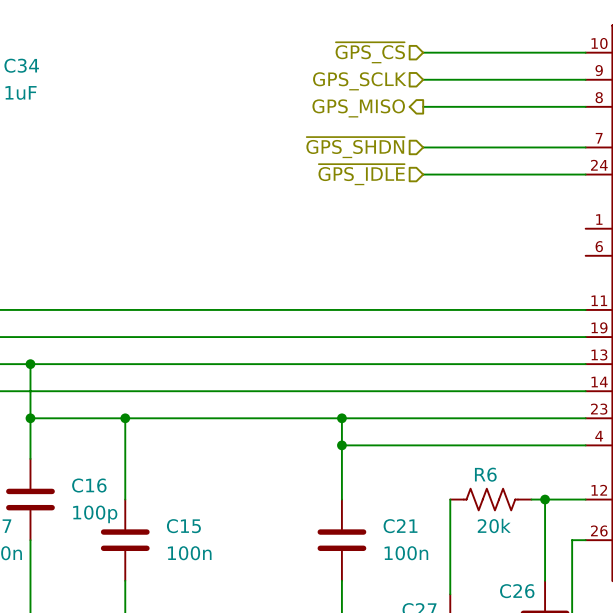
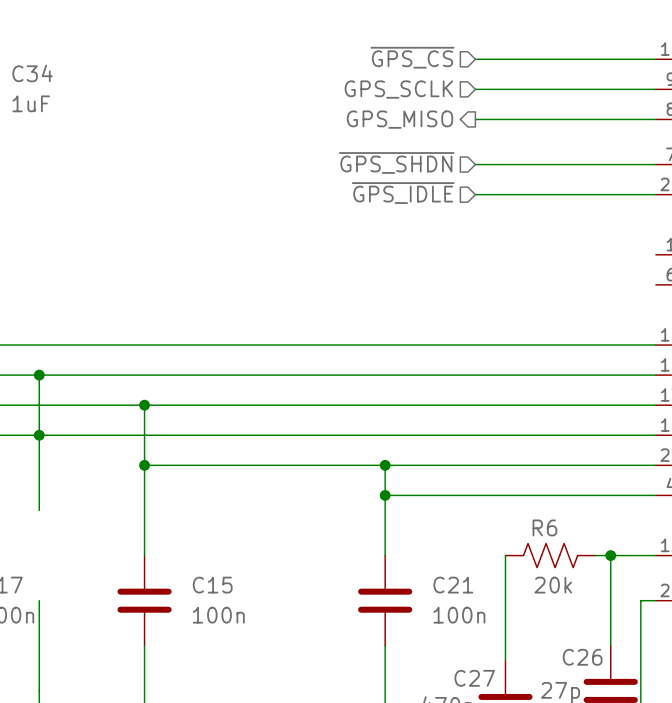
wire: none -> (39, 375) (39, 405)
junction: none -> (39, 375)
junction: (30, 364) -> none
junction: none -> (144, 405)
junction: none -> (39, 435)
wire: (30, 418) (125, 418) -> (144, 405) (144, 465)
junction: (30, 418) -> none
C16: 100p (30, 499) -> none

